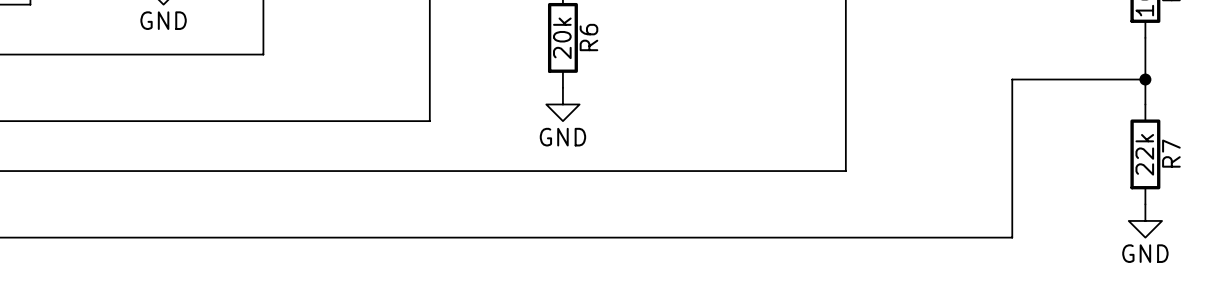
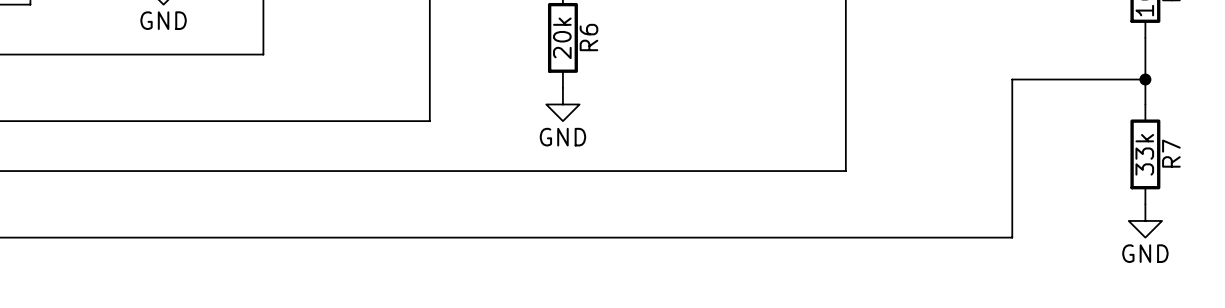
R7 value: 22k (1144, 154) -> 33k (1144, 154)

